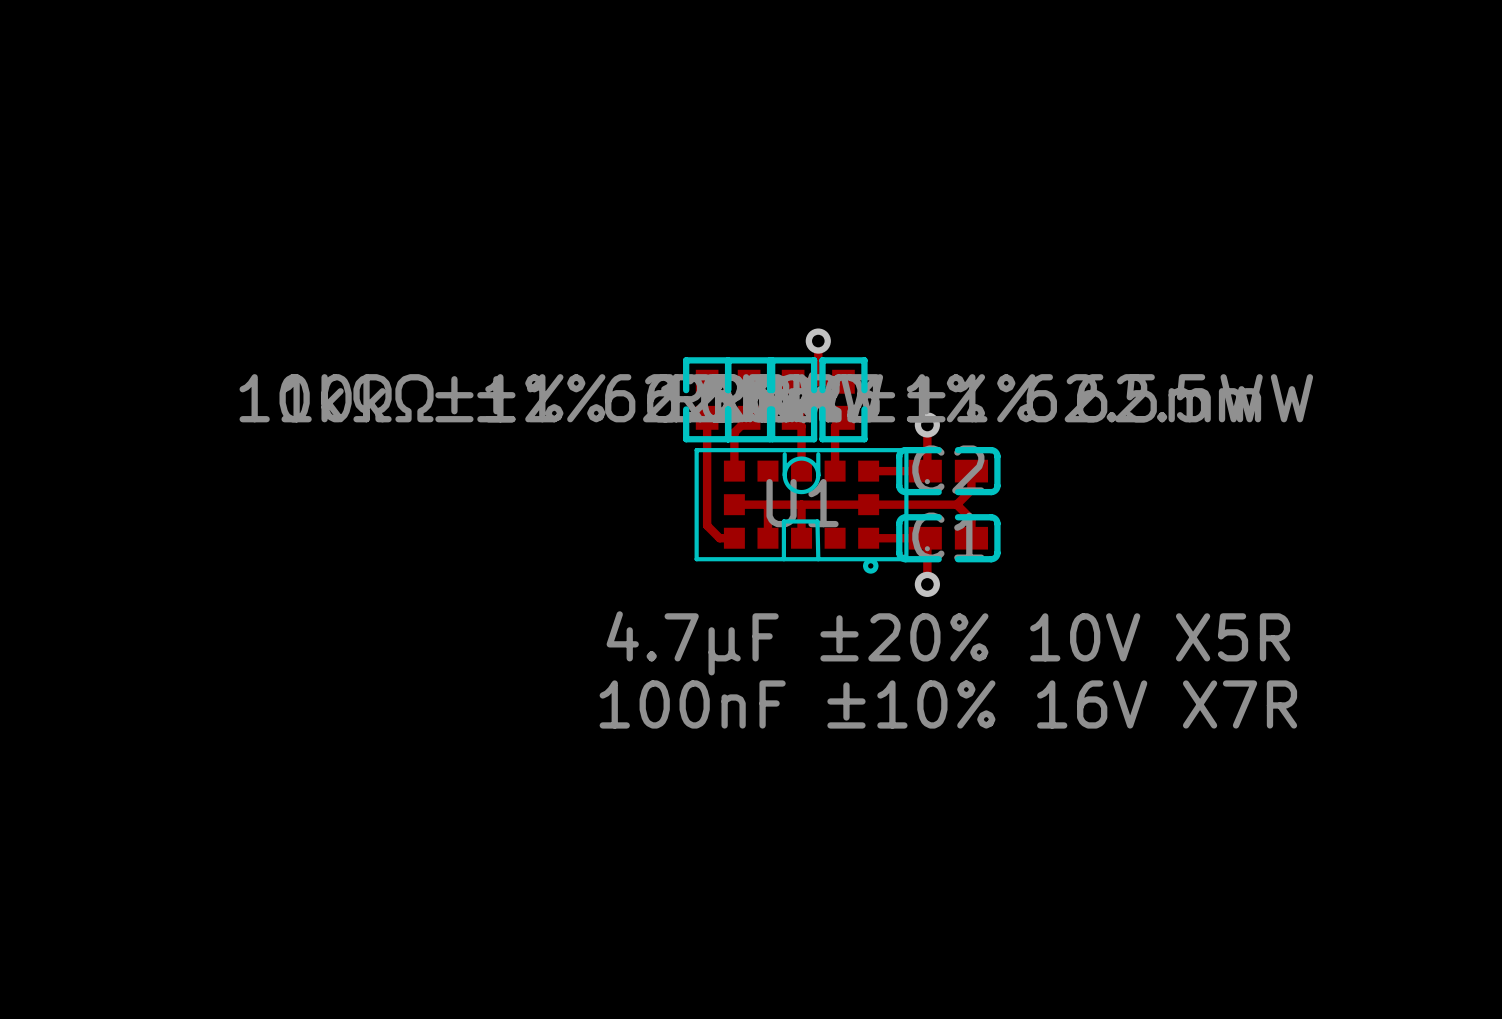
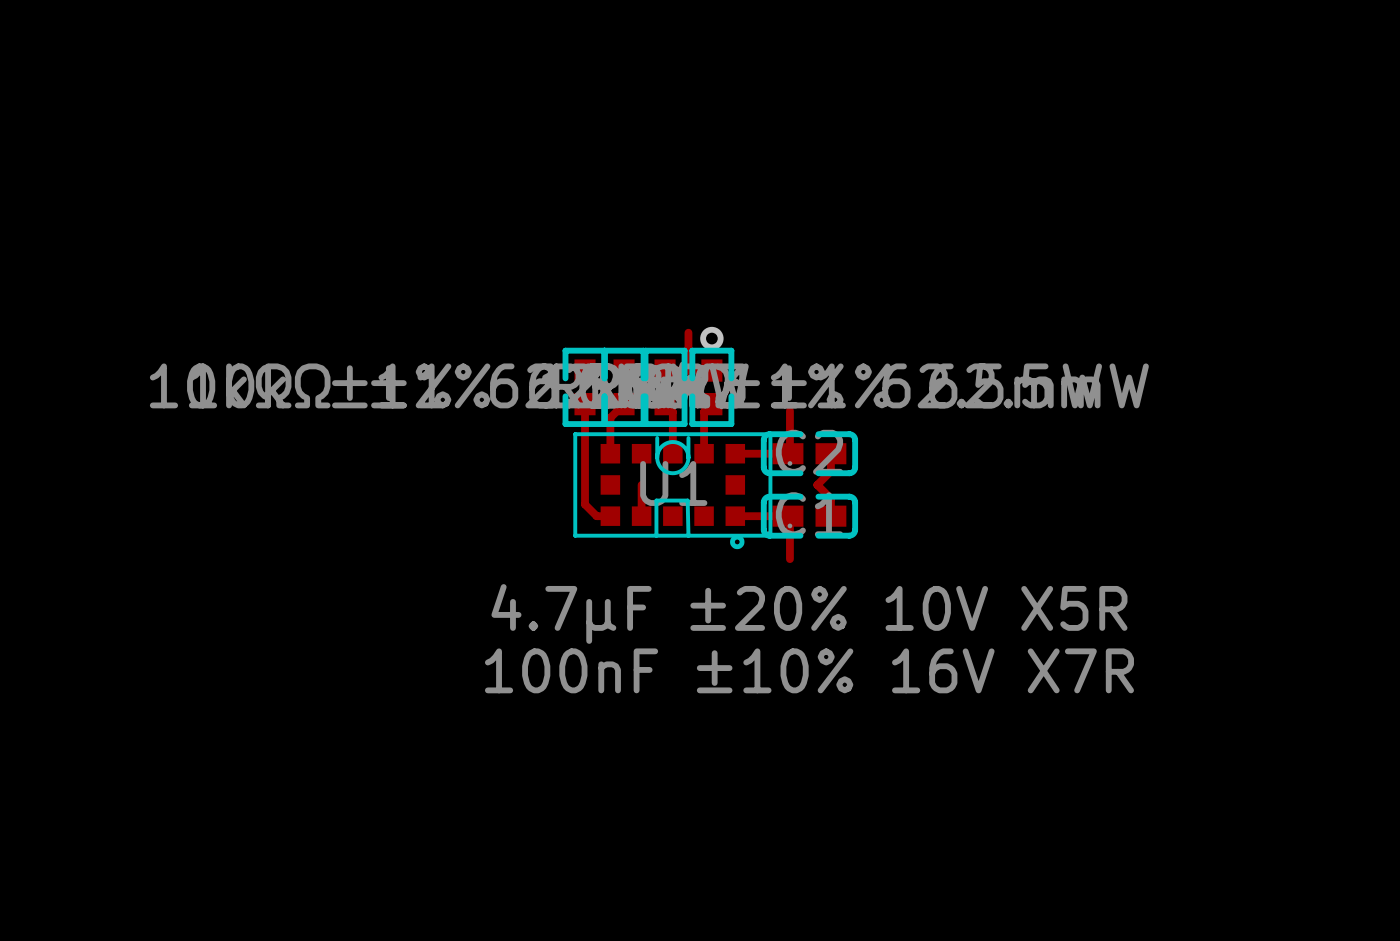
via position: (818, 341) -> (711, 338)
via: (927, 424) -> none
track: (734, 504) (956, 504) -> none
track: (801, 504) (801, 538) -> none
via: (927, 584) -> none

